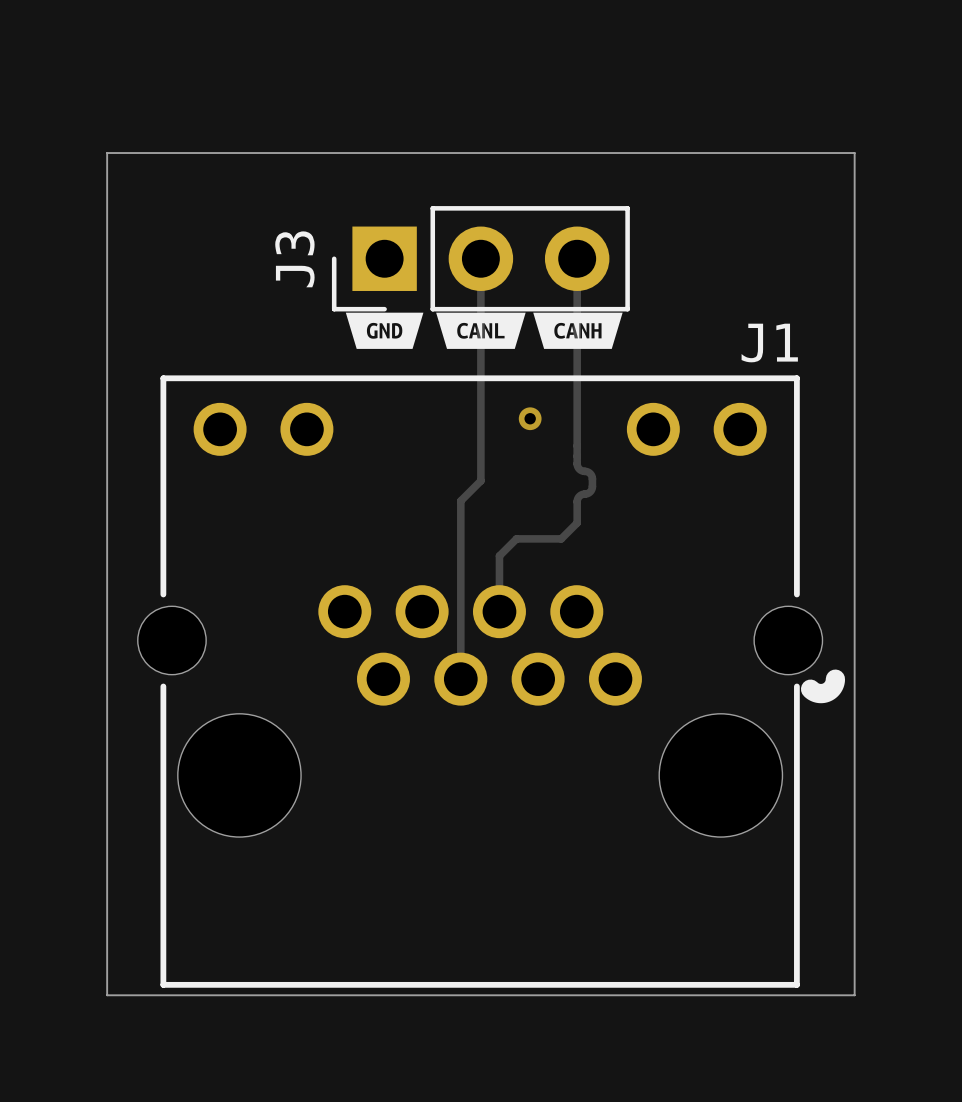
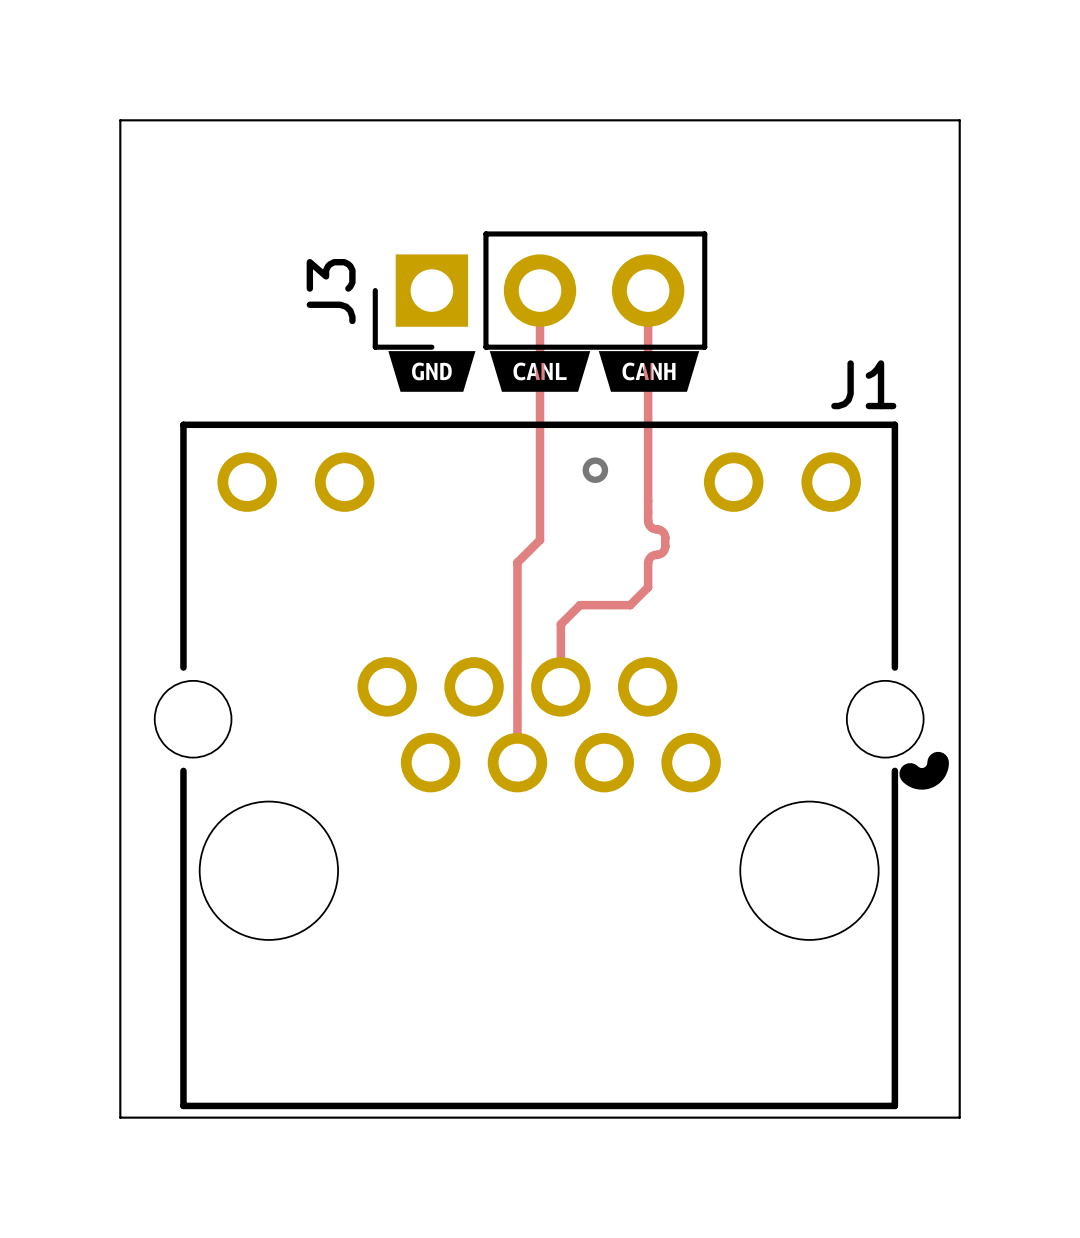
board edge: (107, 153) (854, 153) -> (120, 171) (120, 120) (959, 120) (959, 171)

